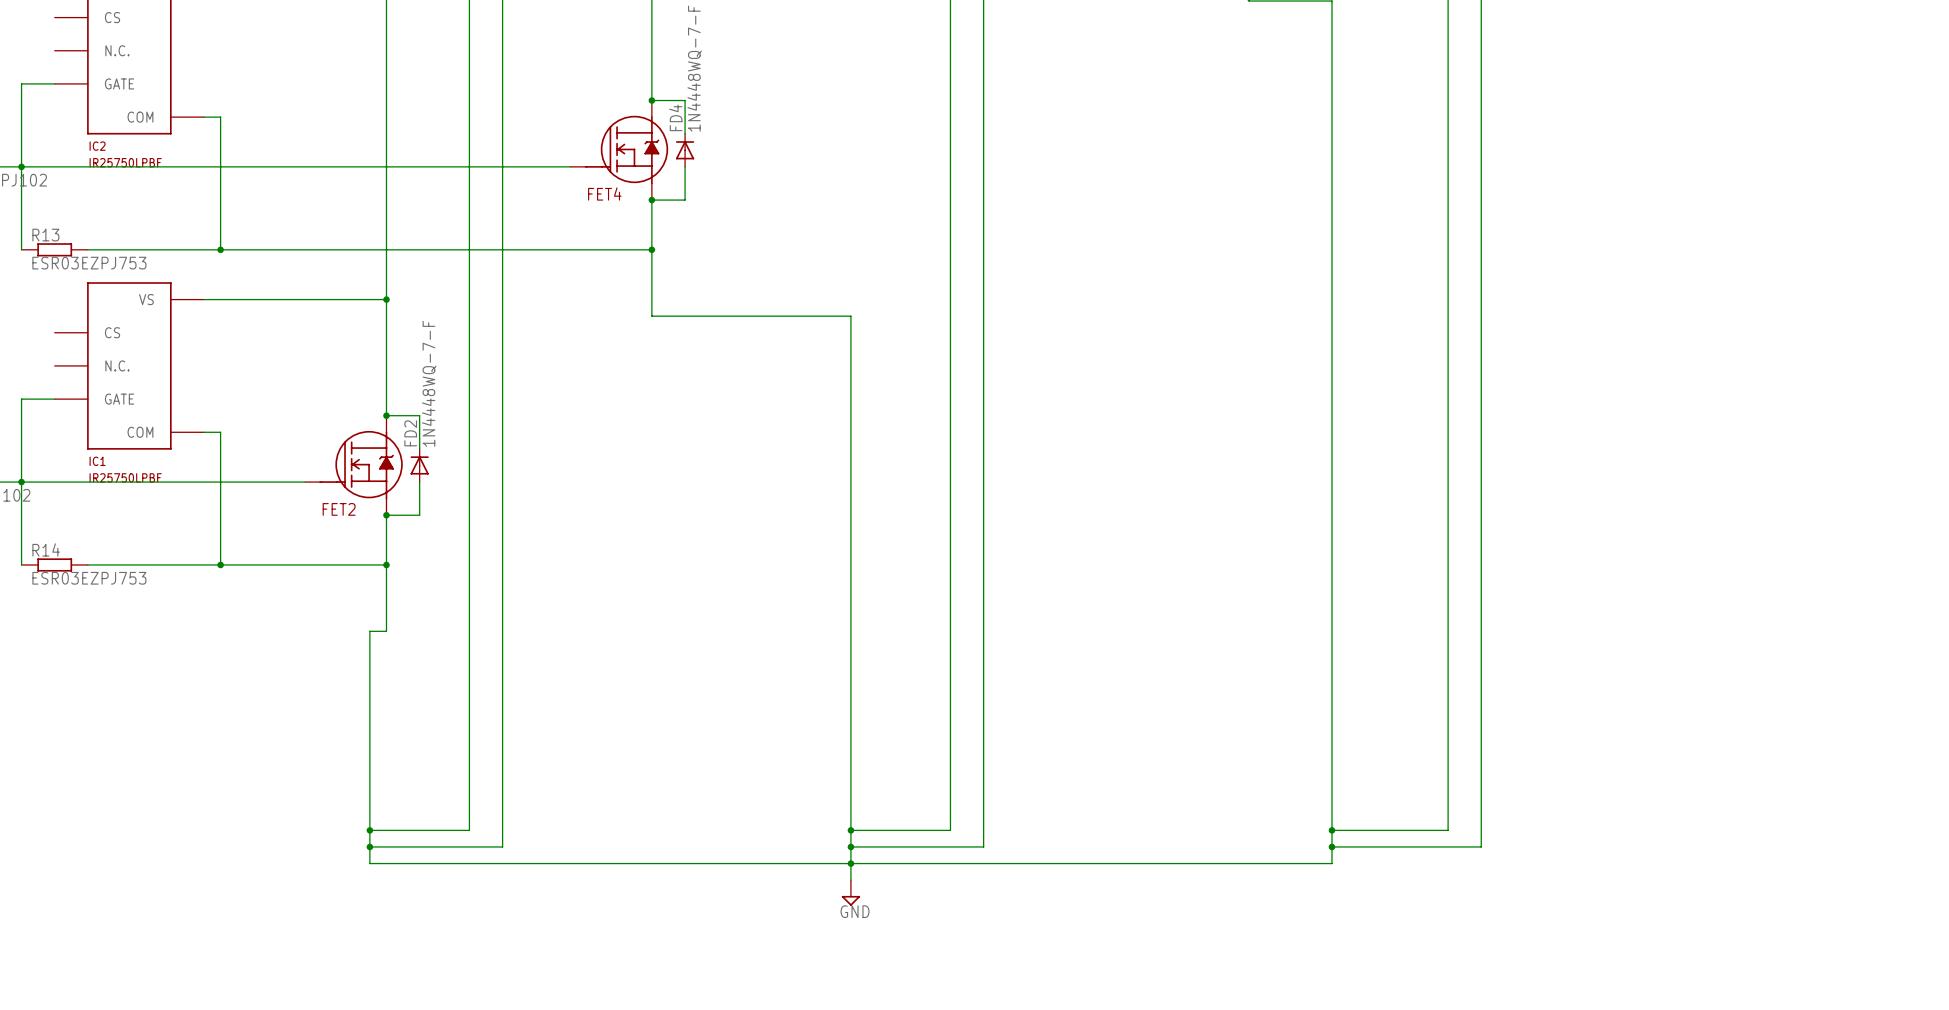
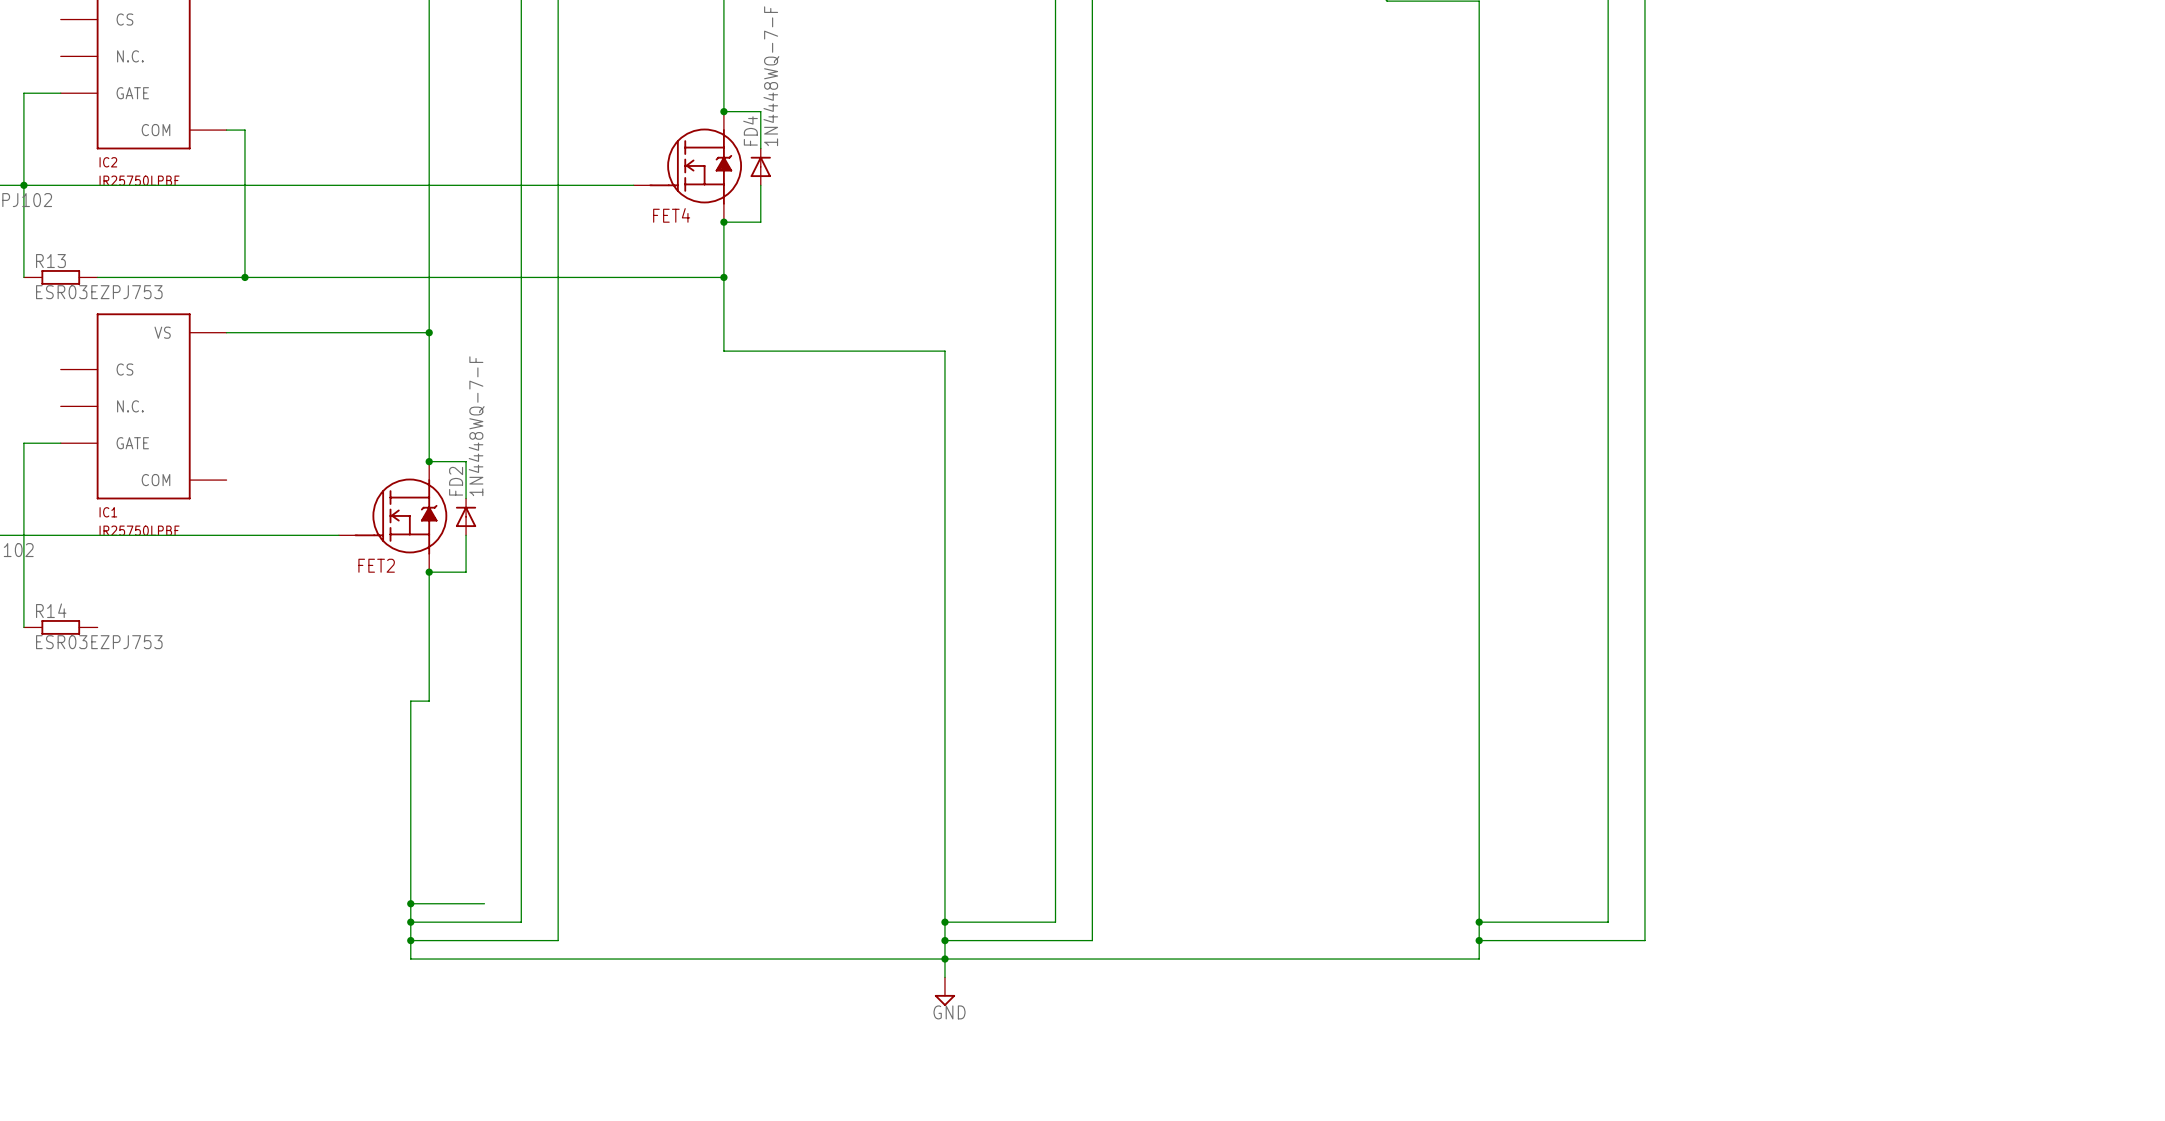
wire: (204, 432) (220, 432) (220, 564) -> none
junction: (21, 482) -> none
wire: (87, 564) (386, 564) -> none
junction: (220, 564) -> none
junction: (386, 564) -> none
wire: none -> (410, 903) (484, 903)
junction: none -> (410, 903)

